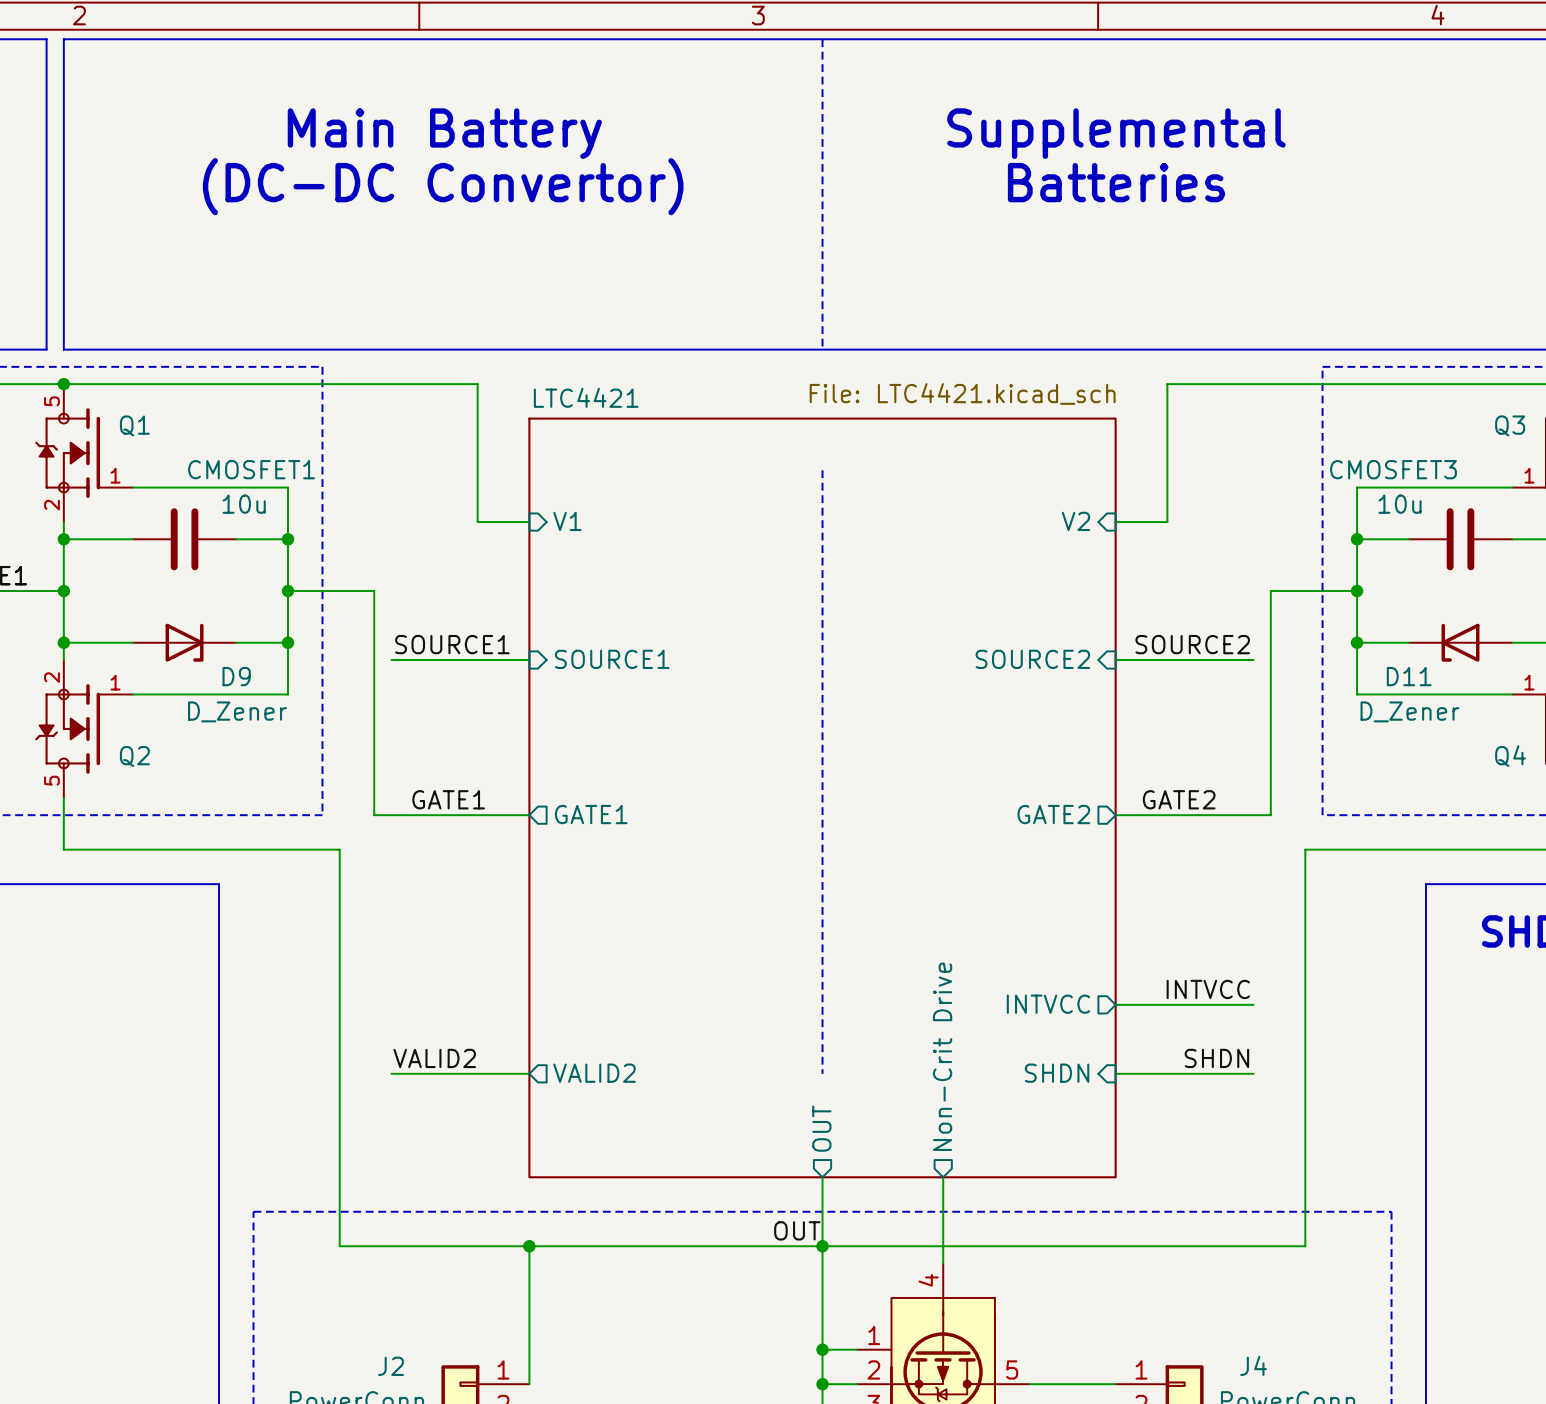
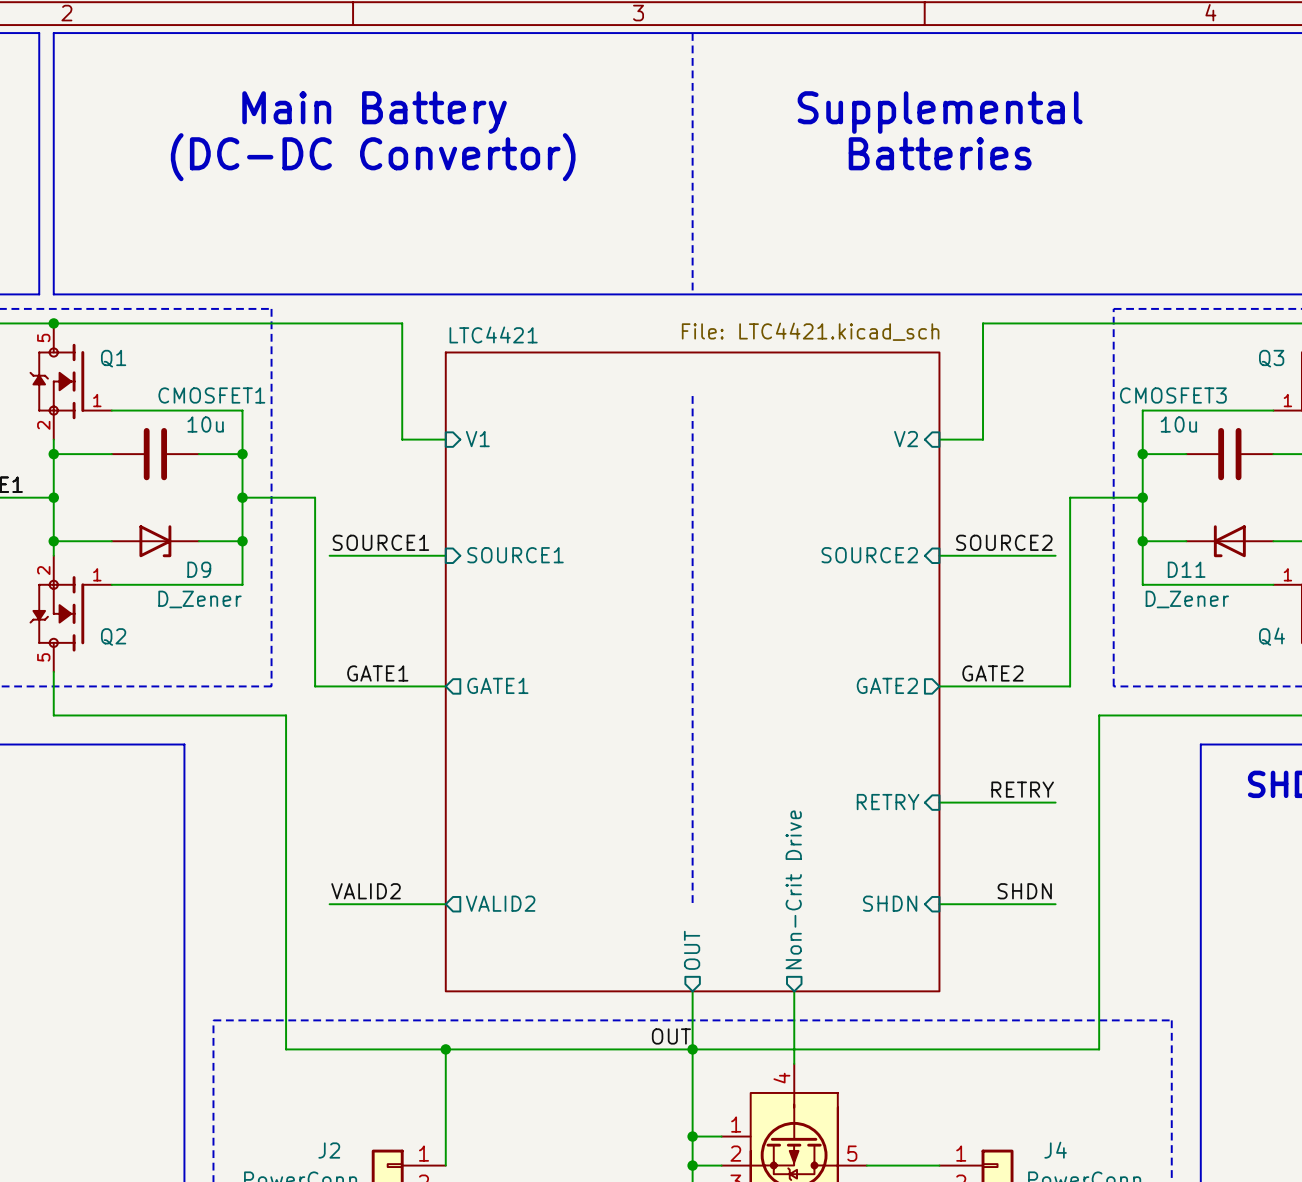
label: none -> RETRY (1022, 789)
sheet pin: none -> RETRY (888, 802)
label: INTVCC (1208, 989) -> none
sheet pin: INTVCC (1048, 1004) -> none
wire: (1115, 1004) (1253, 1004) -> (939, 802) (1055, 802)

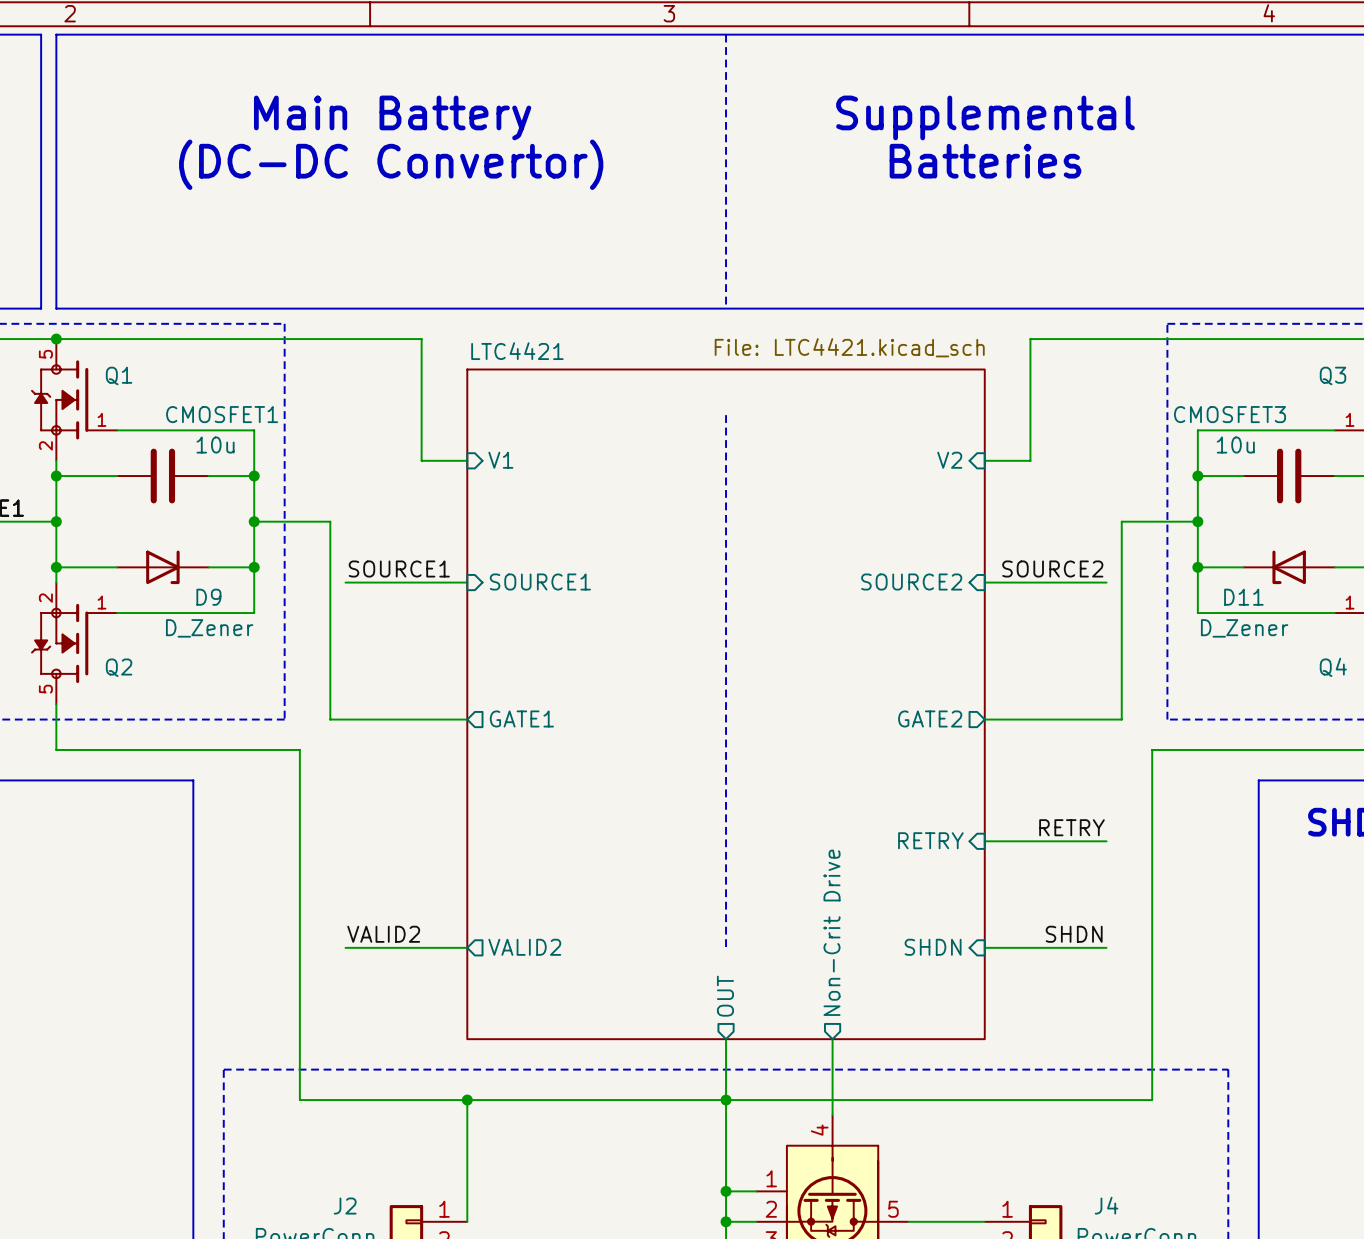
label: GATE1 (377, 673) -> none
label: GATE2 (992, 673) -> none
label: OUT (671, 1036) -> none

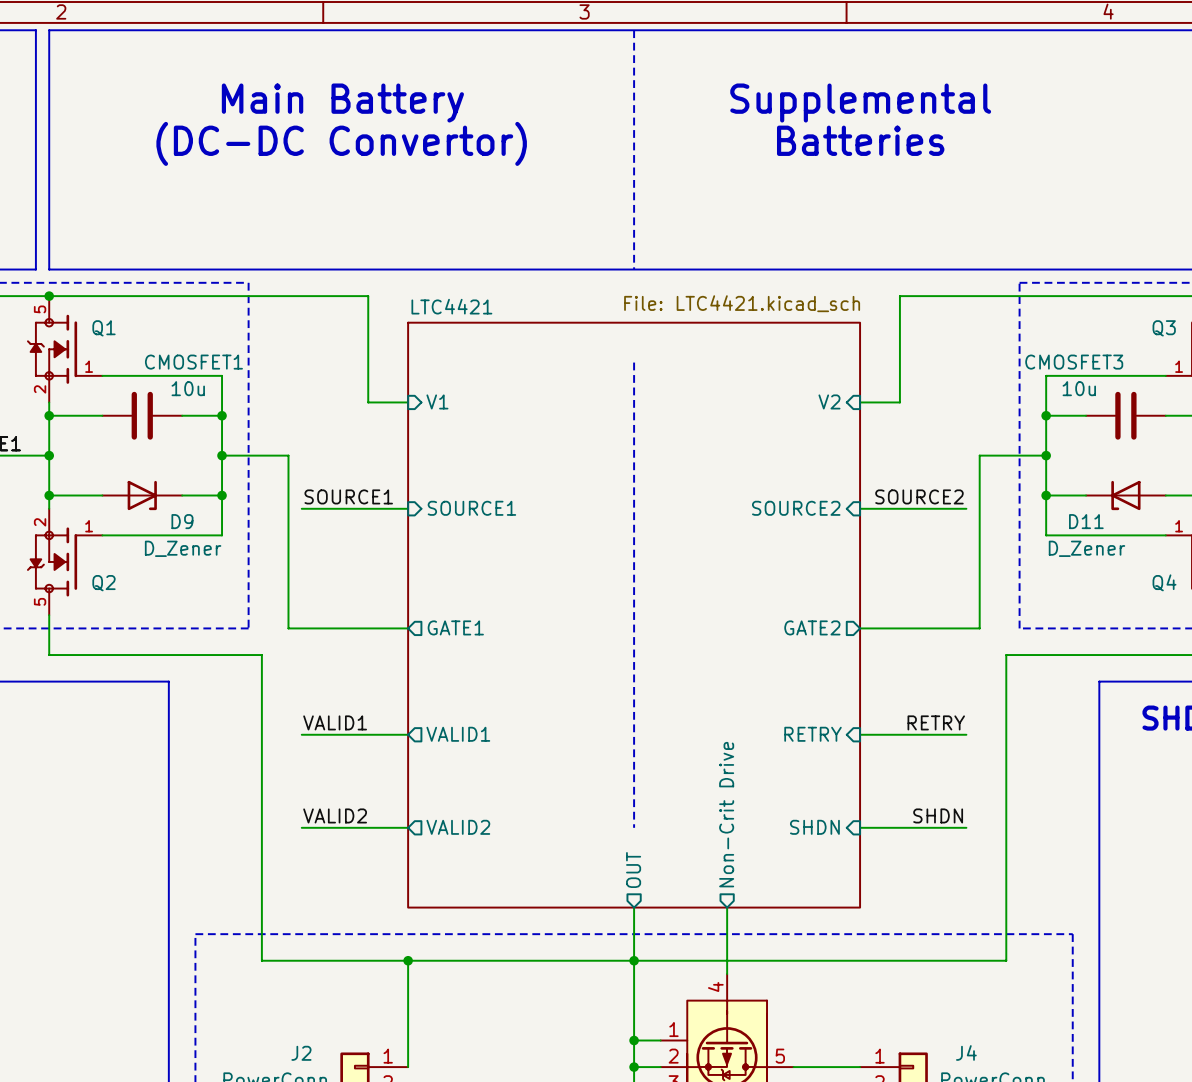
label: none -> VALID1 (335, 722)
sheet pin: none -> VALID1 (458, 734)
wire: none -> (301, 734) (408, 734)

